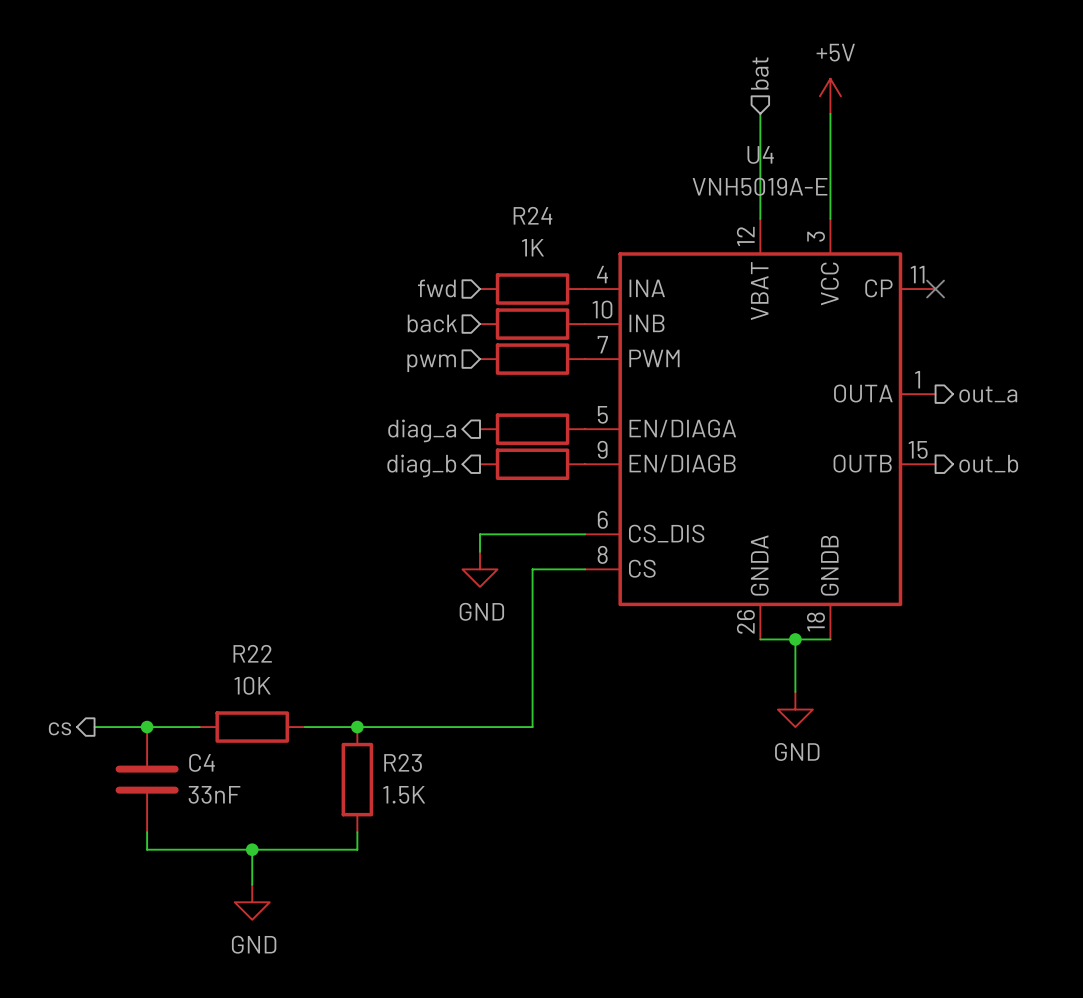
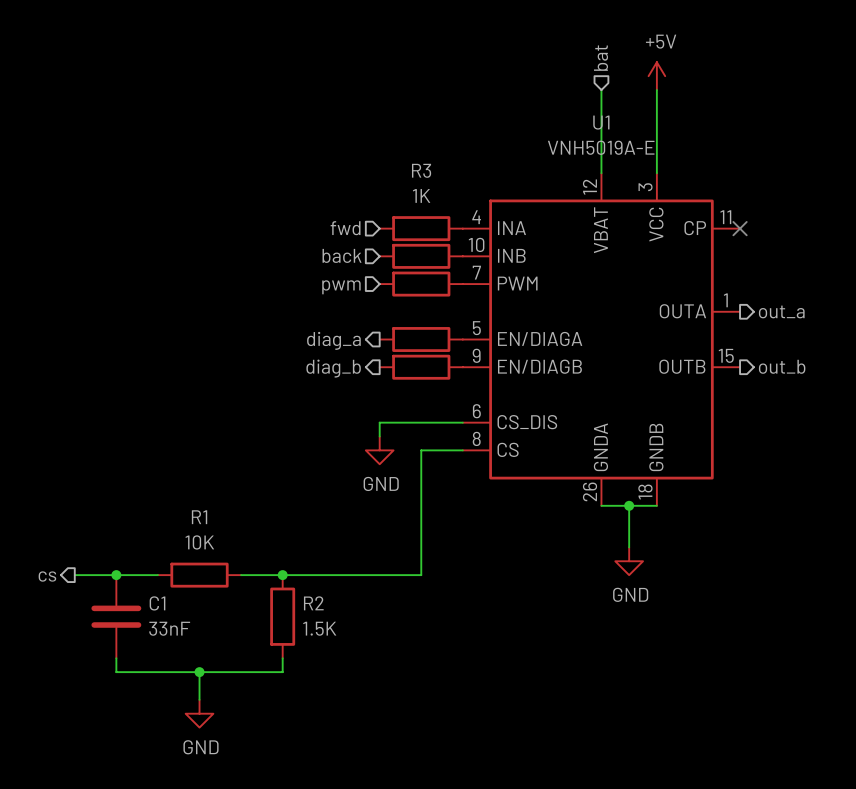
U4 name: U4 (760, 154) -> U1 (601, 122)
R24 name: R24 (532, 215) -> R3 (421, 170)
R22 name: R22 (252, 653) -> R1 (199, 517)
C4 name: C4 (202, 762) -> C1 (157, 603)
R23 name: R23 (403, 762) -> R2 (313, 603)

